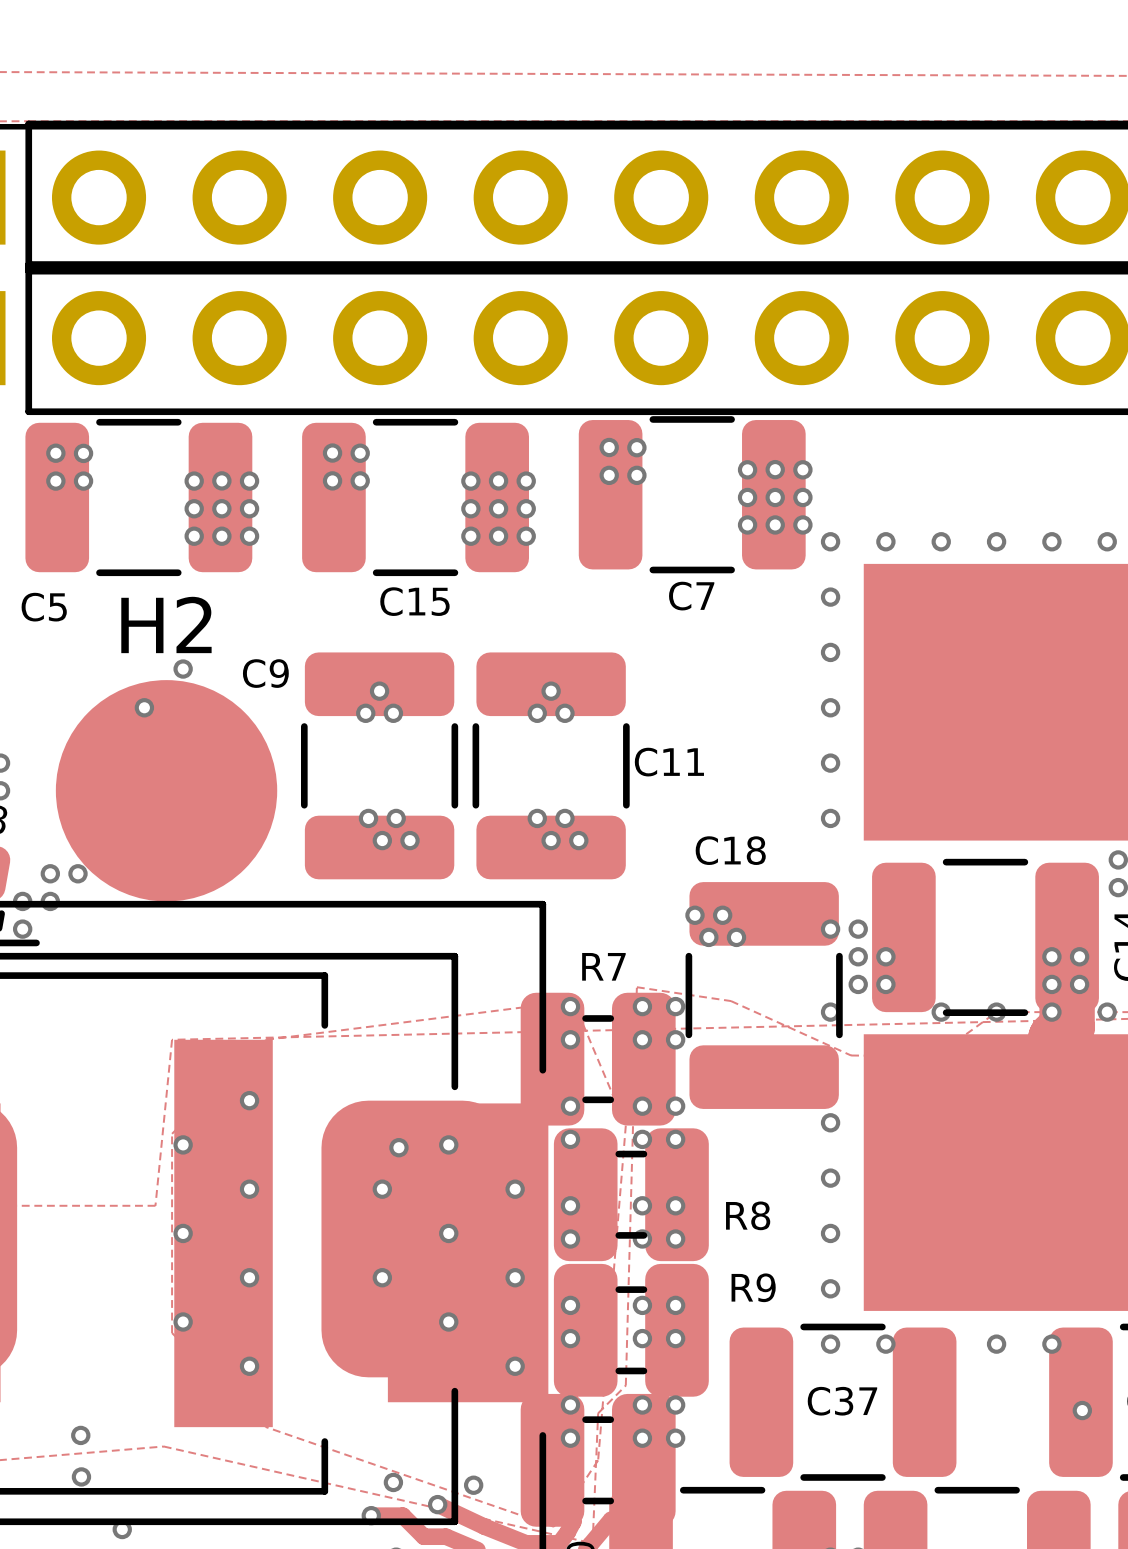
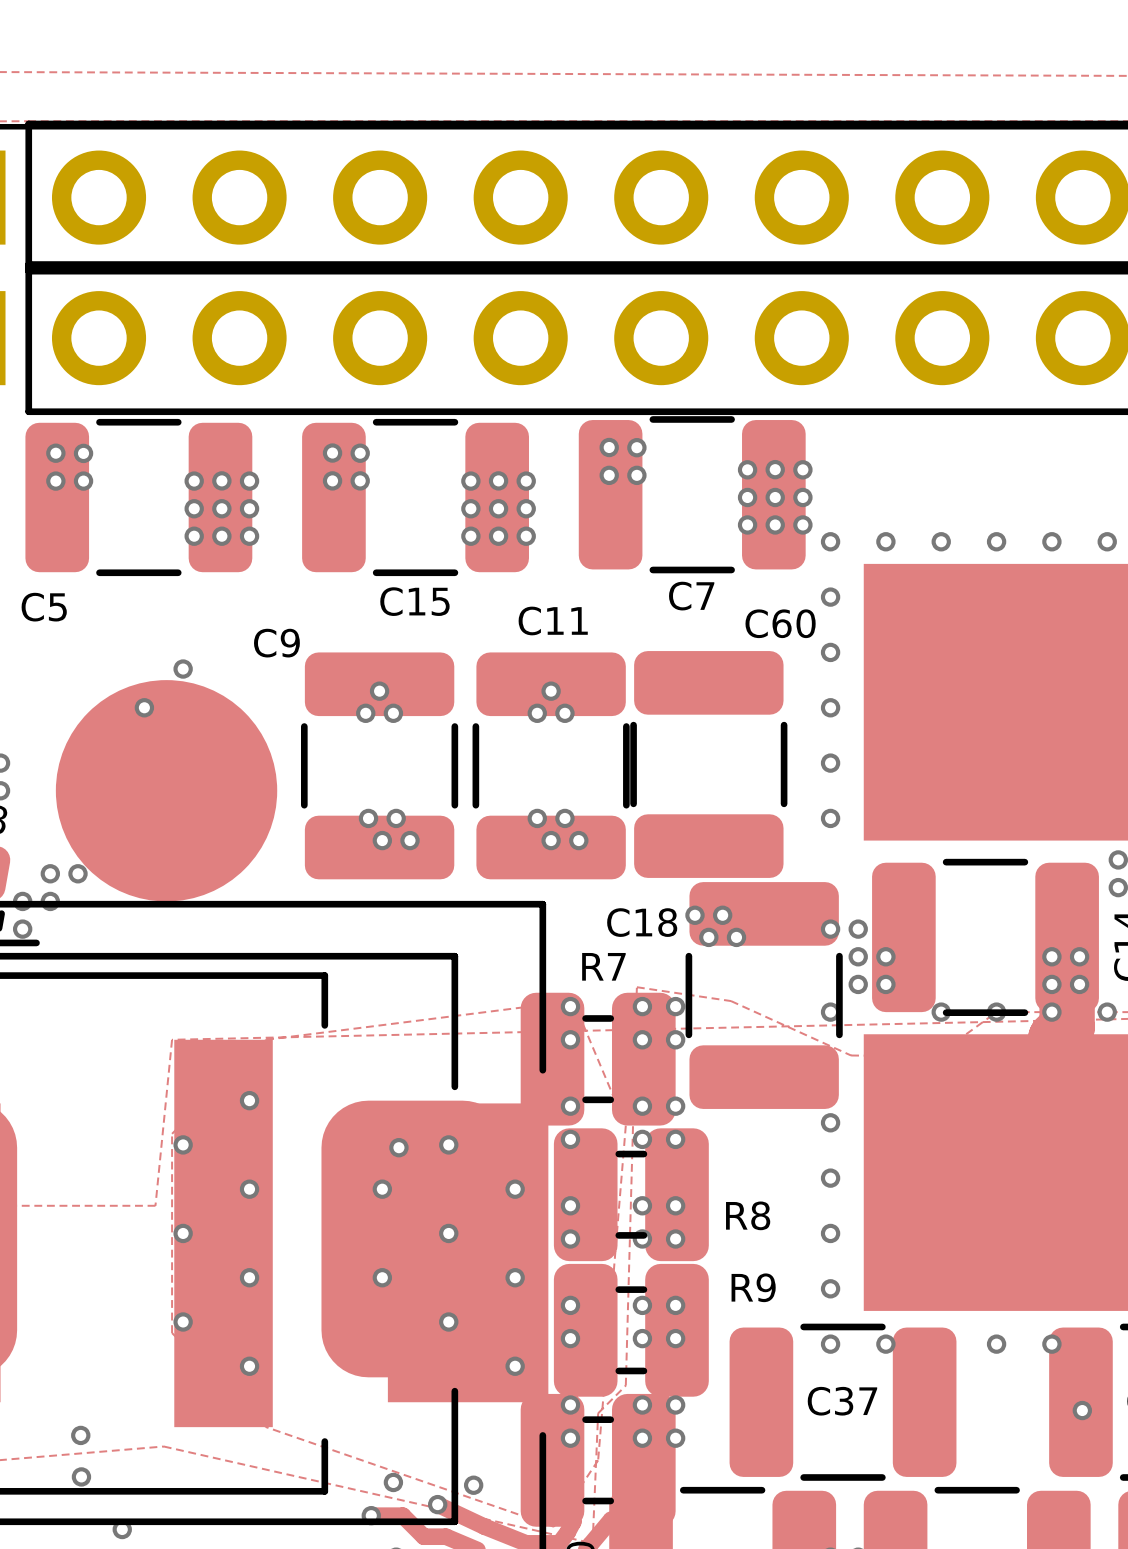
H2 name: H2 (166, 624) -> none
C9 name position: C9 (265, 673) -> C9 (276, 643)
C11 name position: C11 (669, 762) -> C11 (553, 620)
C60: none -> (708, 764)
C18 name position: C18 (730, 850) -> C18 (642, 922)

